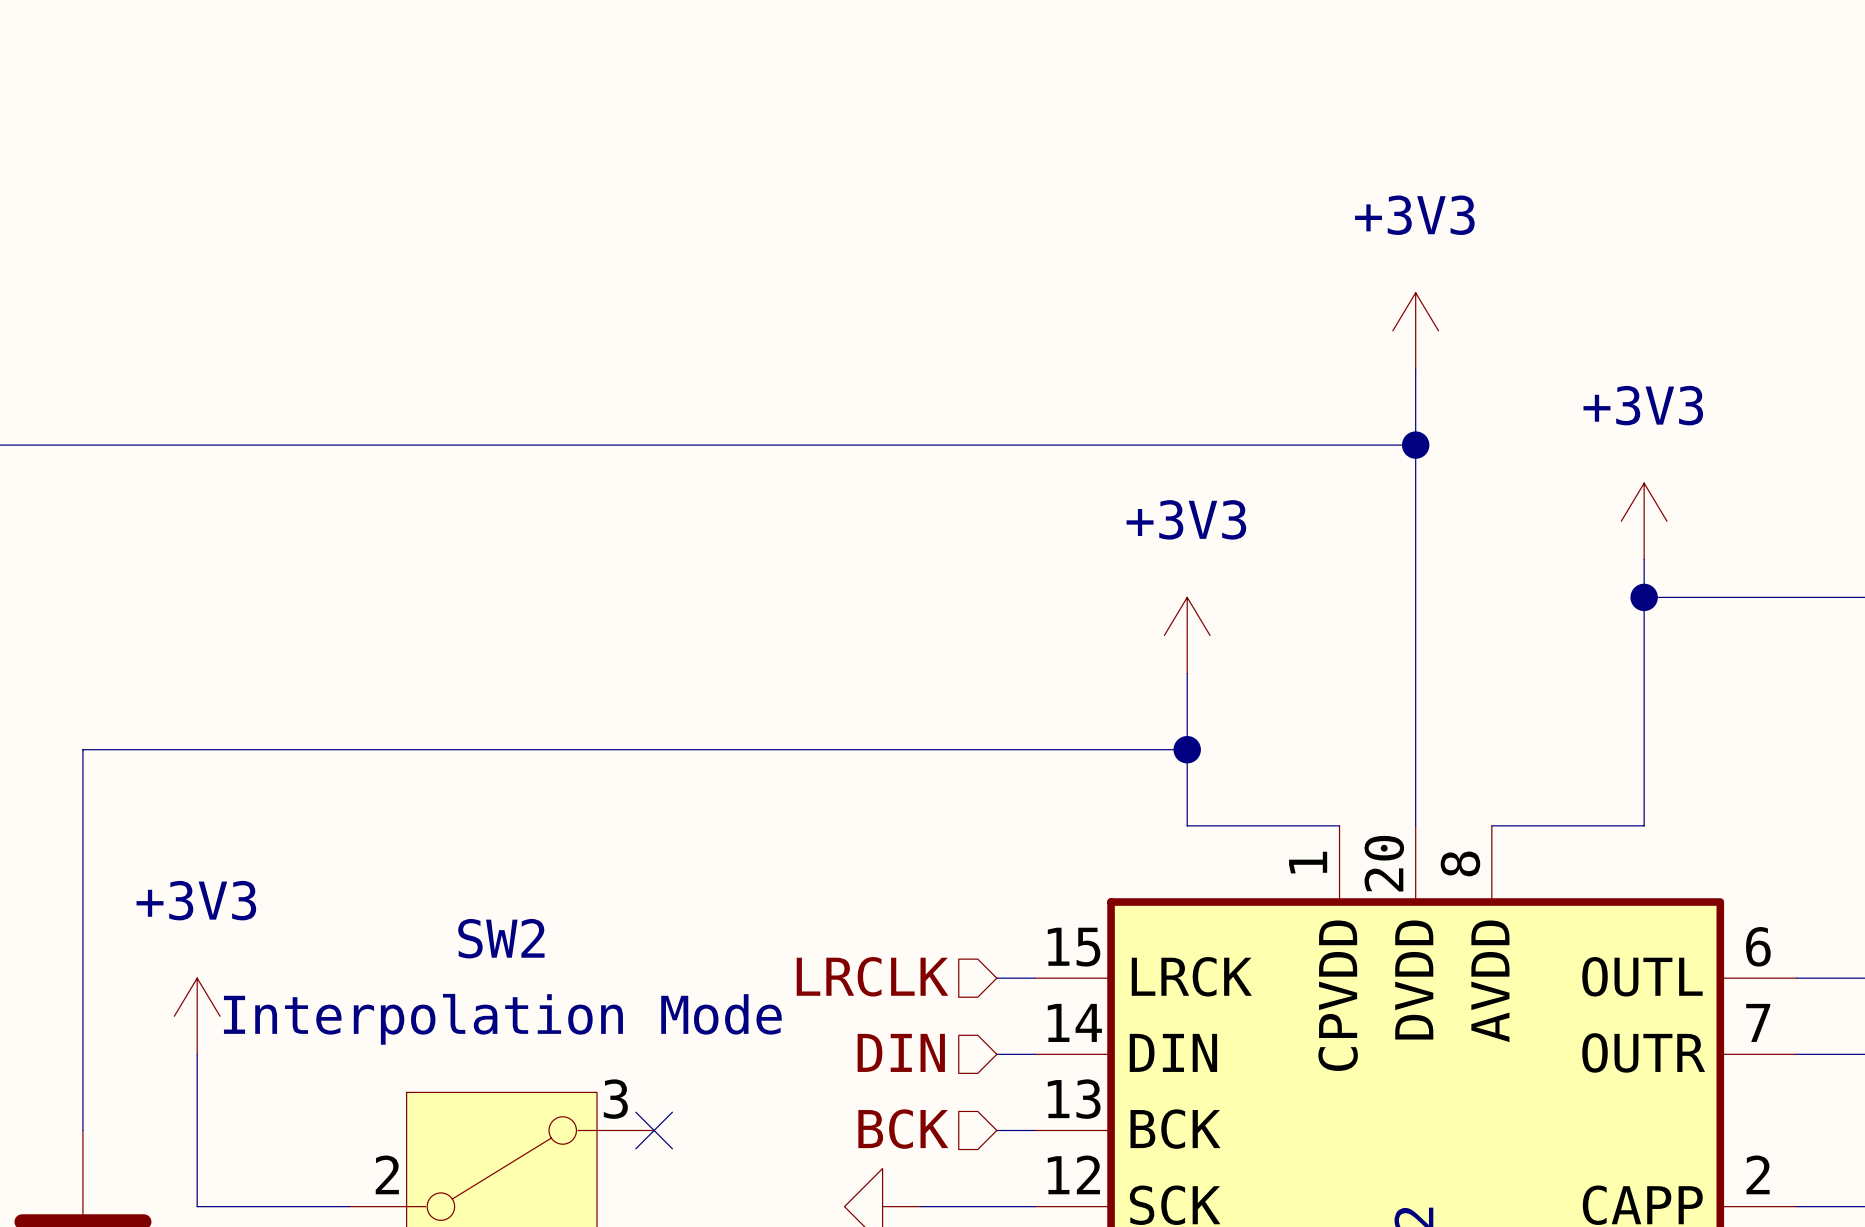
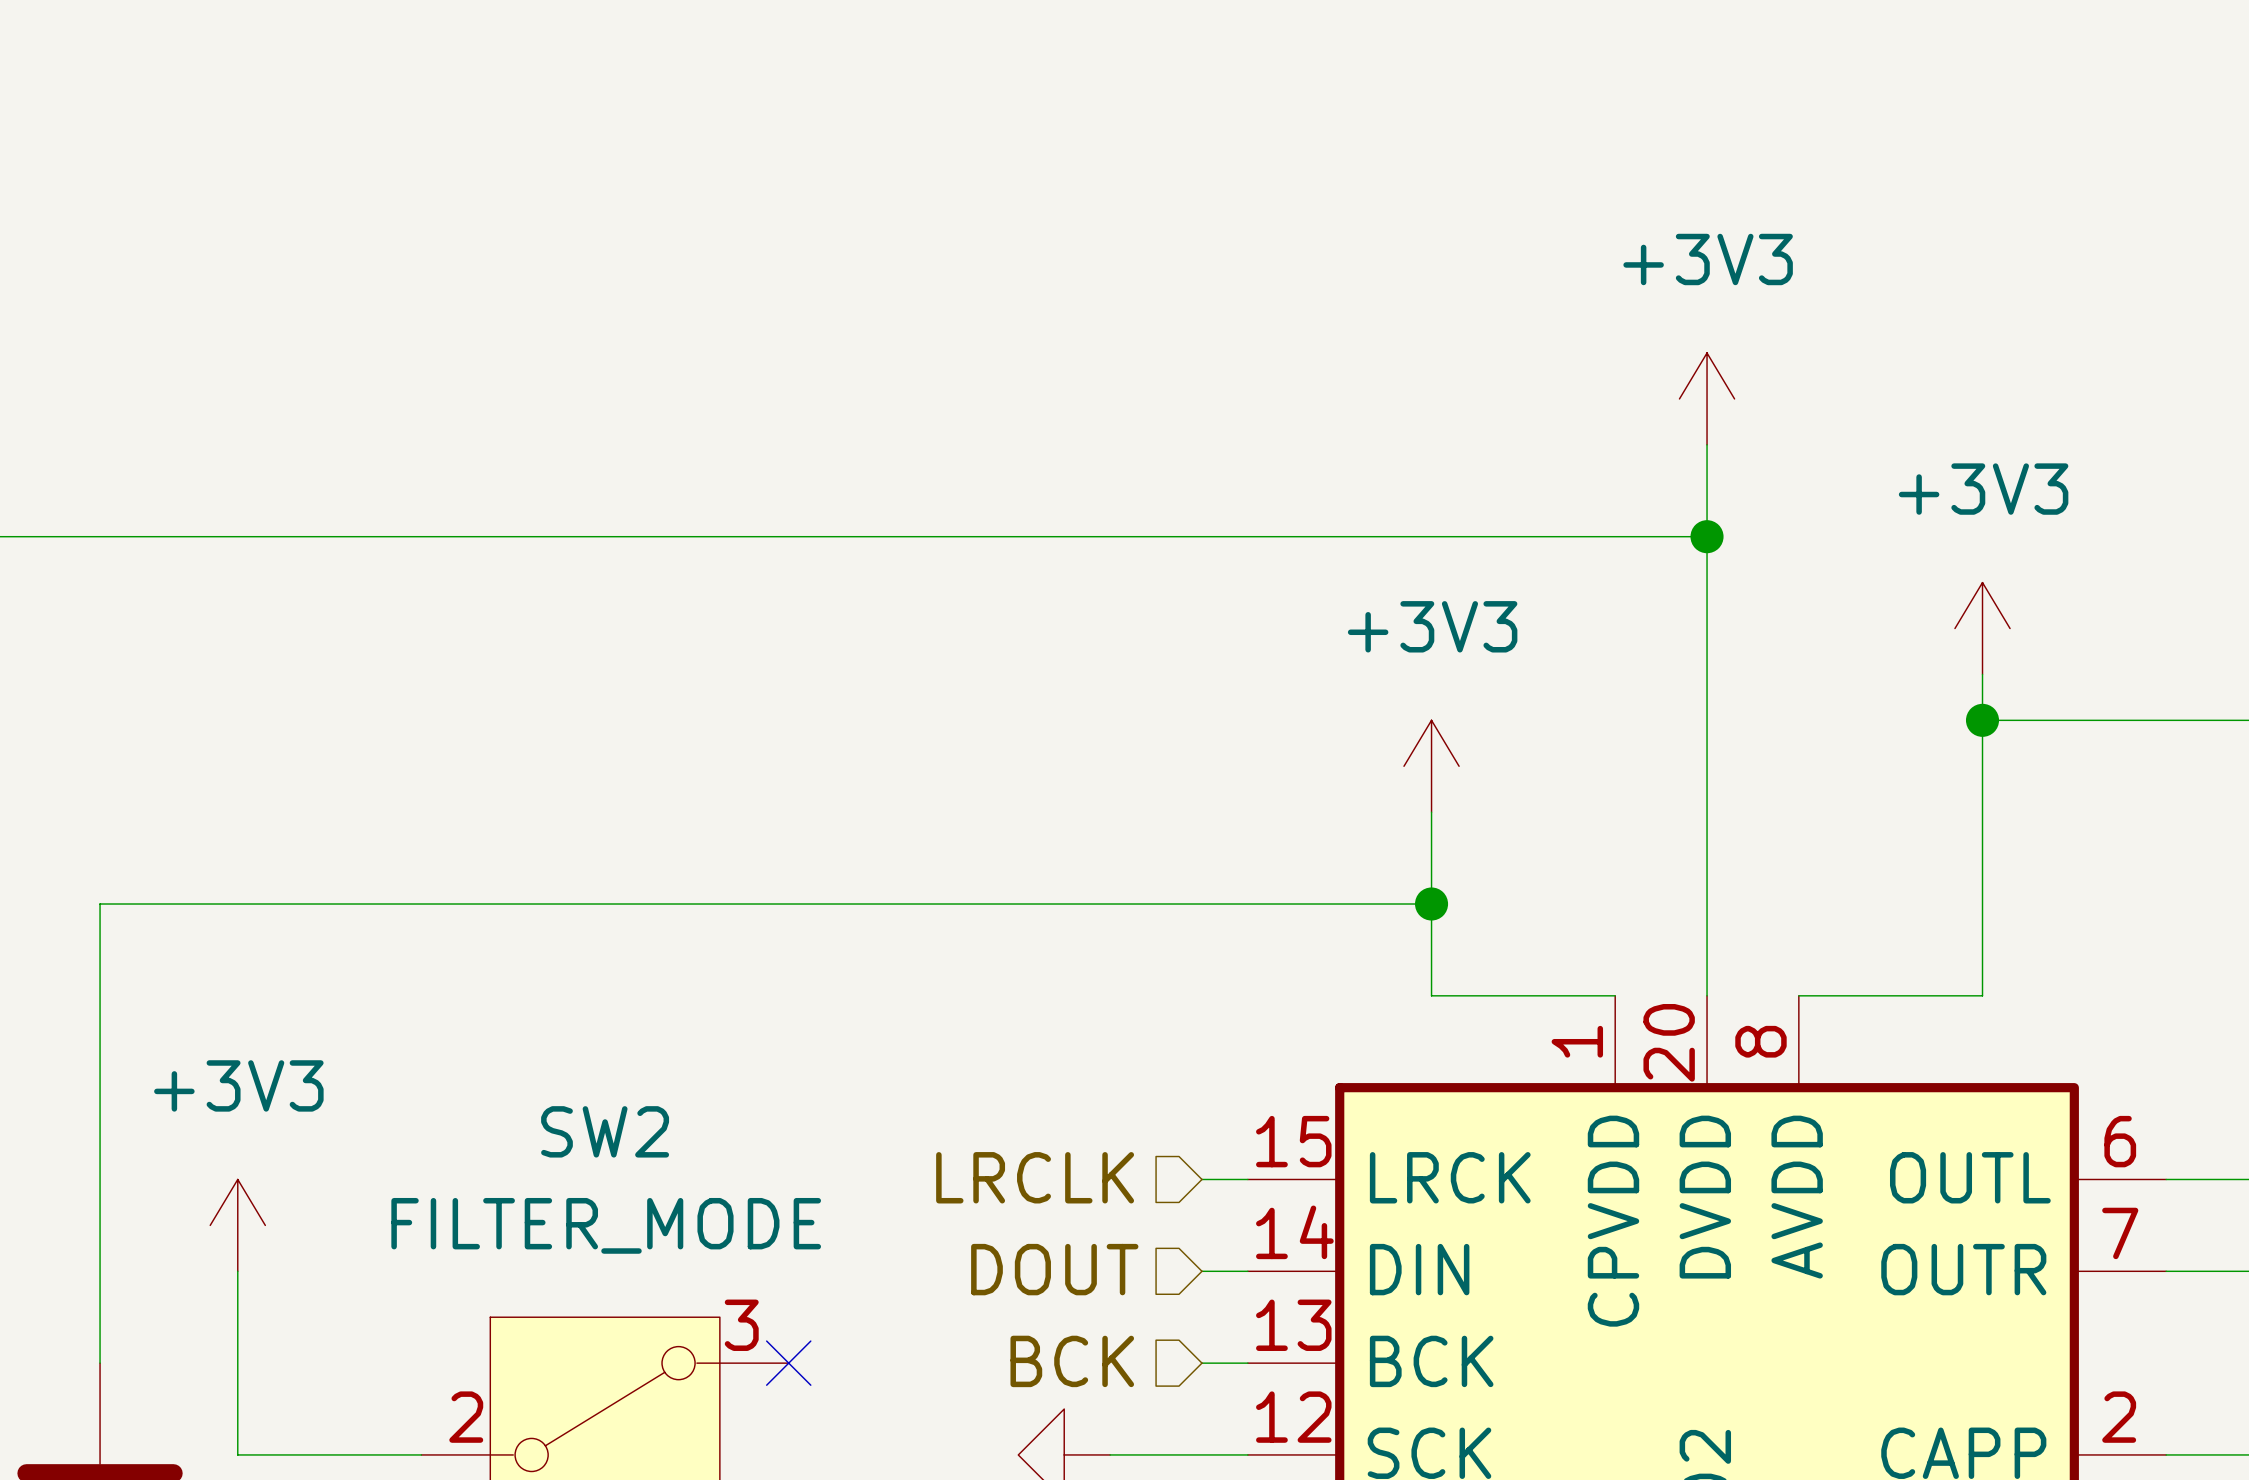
SW2 value: Interpolation Mode (502, 1019) -> FILTER_MODE (606, 1225)
hierarchical label: DIN (901, 1052) -> DOUT (1054, 1269)

